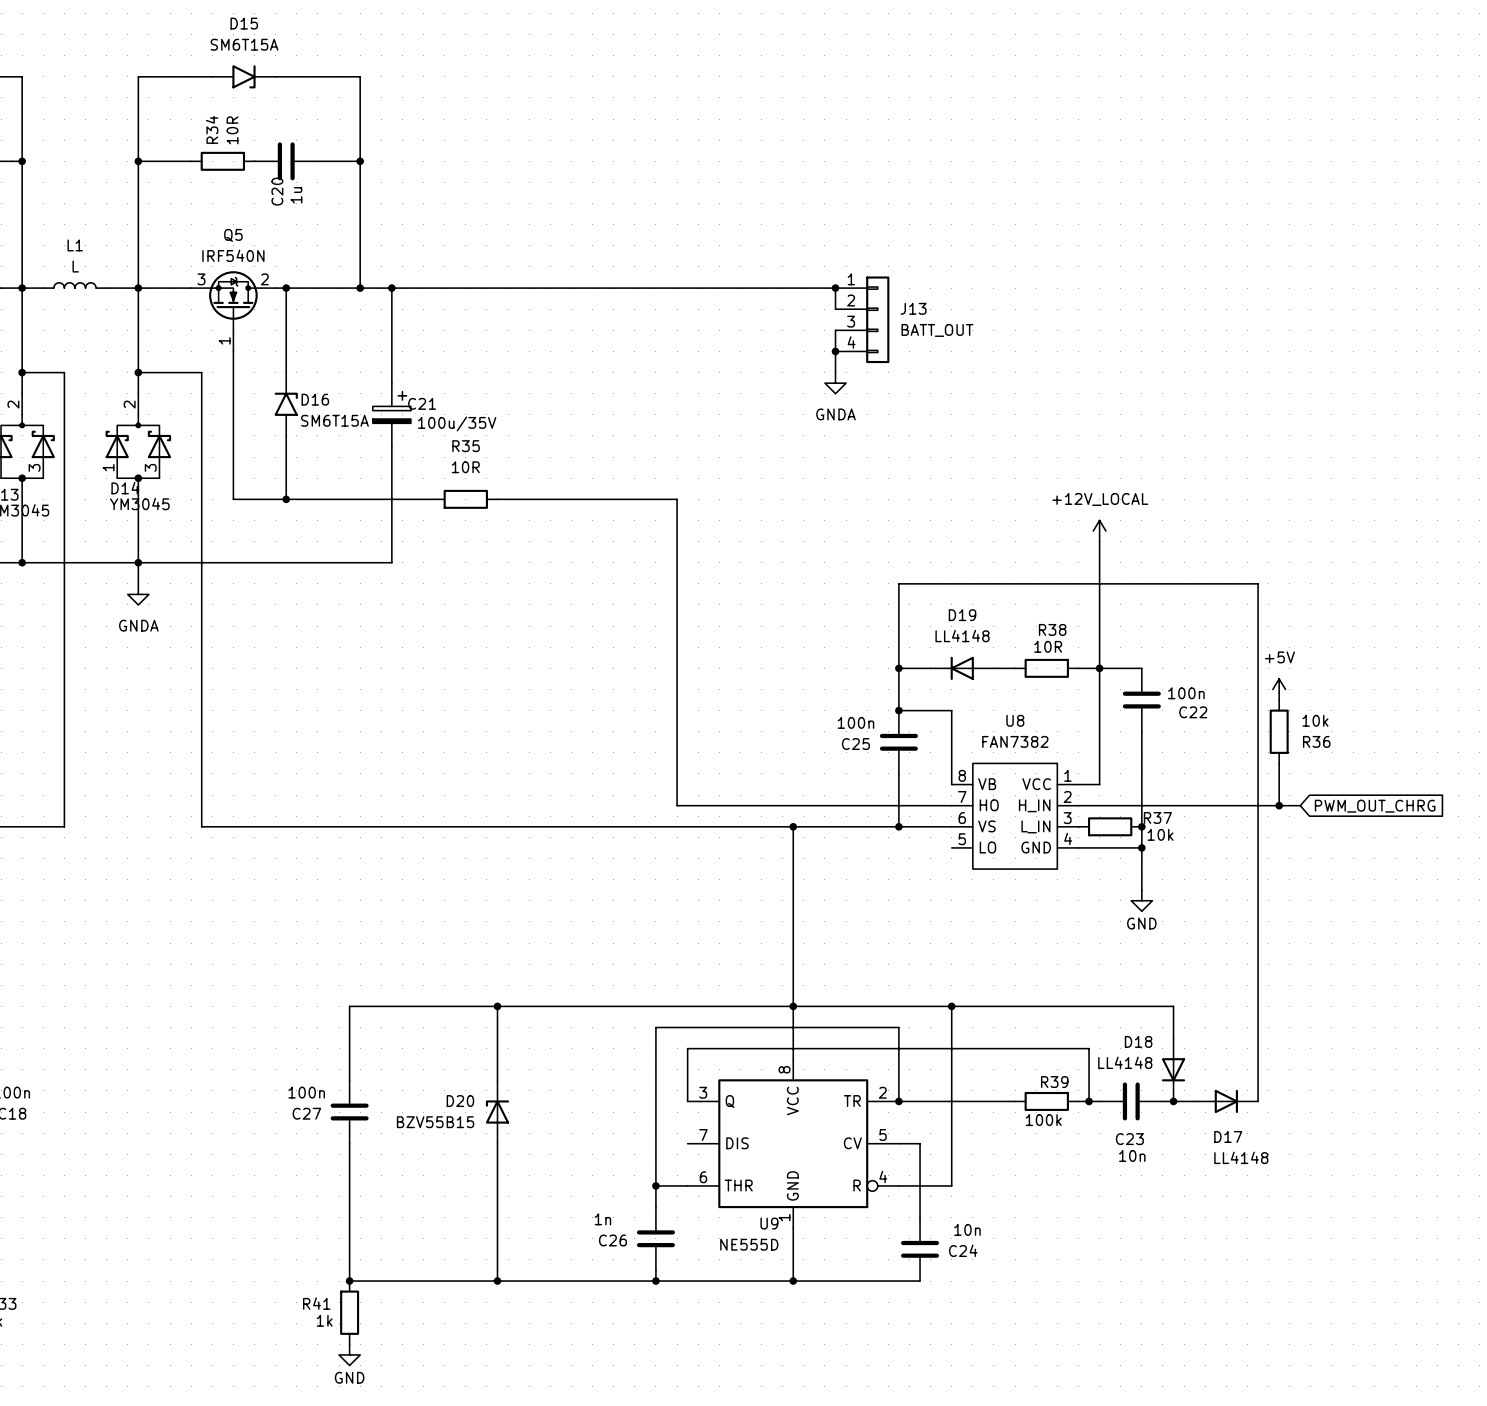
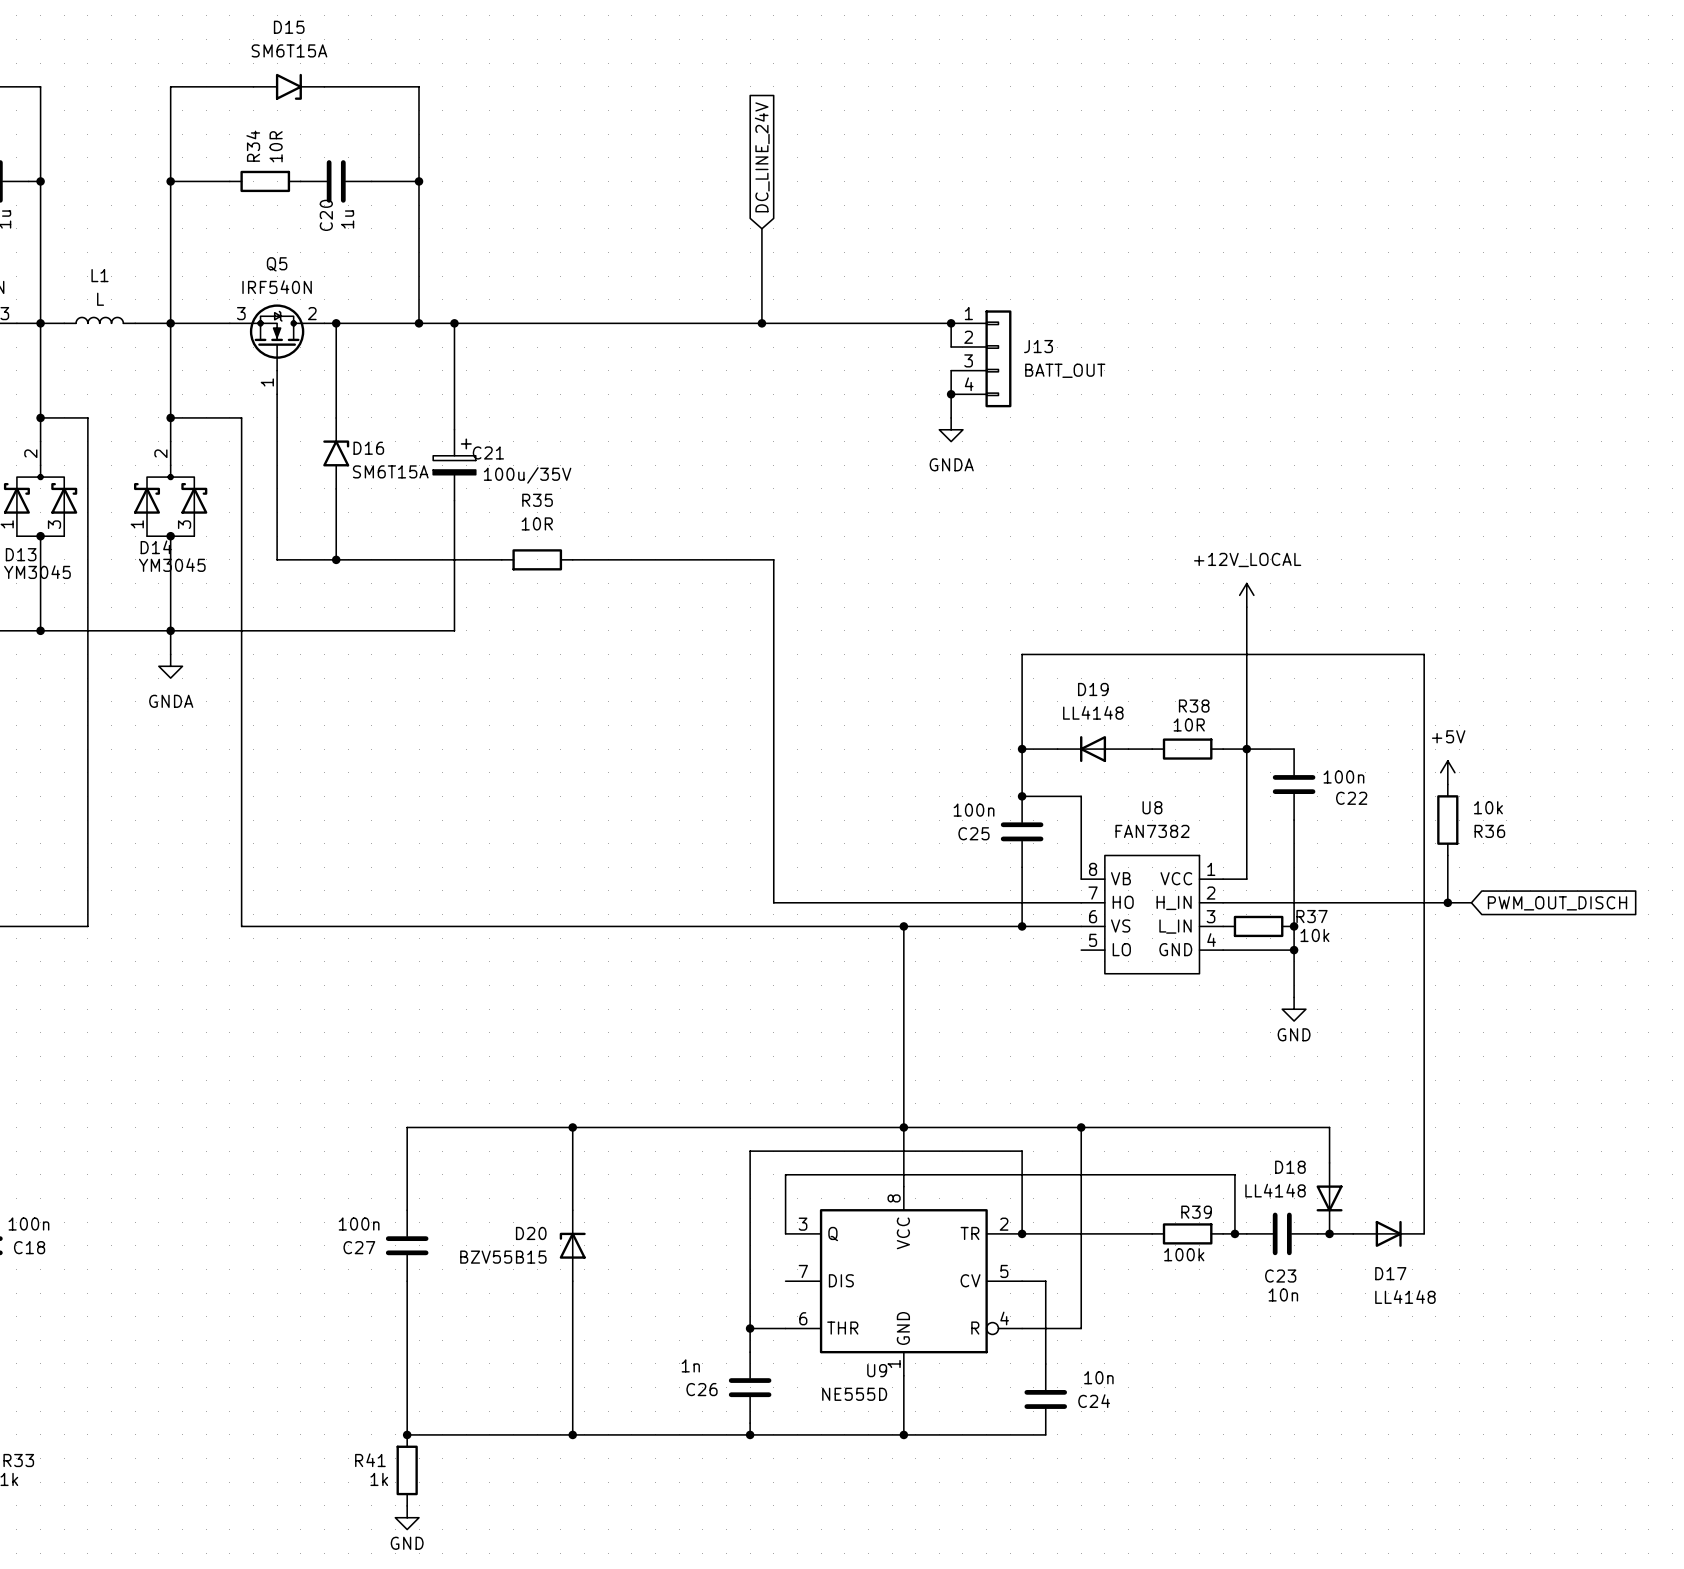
global label: none -> DC_LINE_24V (762, 157)
wire: none -> (761, 228) (761, 323)
junction: none -> (761, 323)
global label: PWM_OUT_CHRG (1375, 806) -> PWM_OUT_DISCH (1557, 903)

